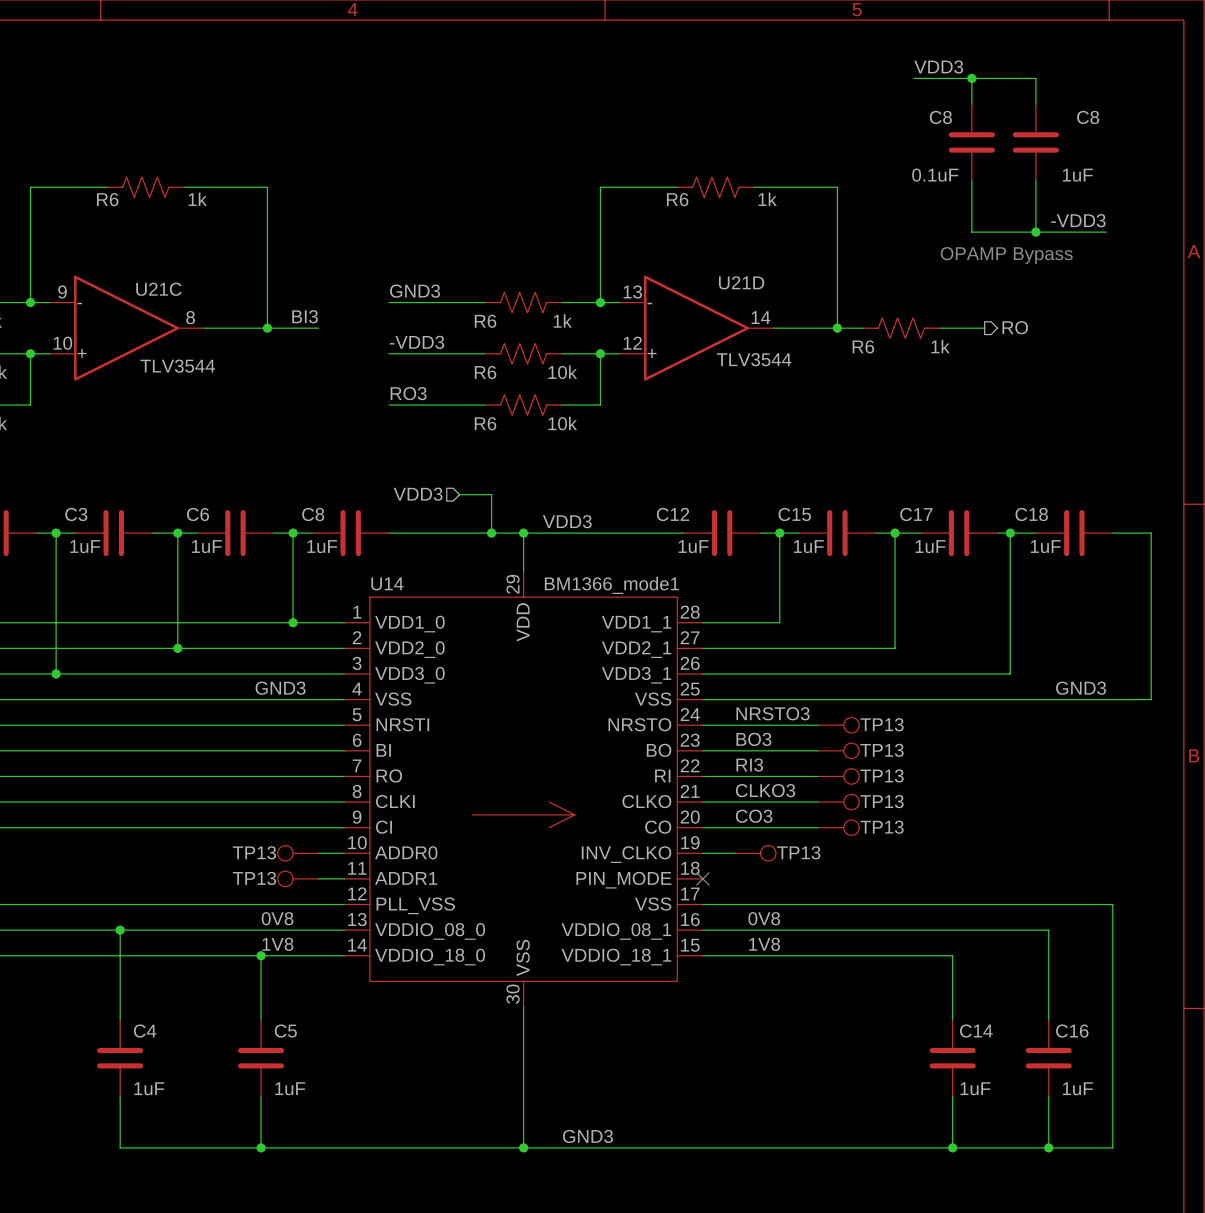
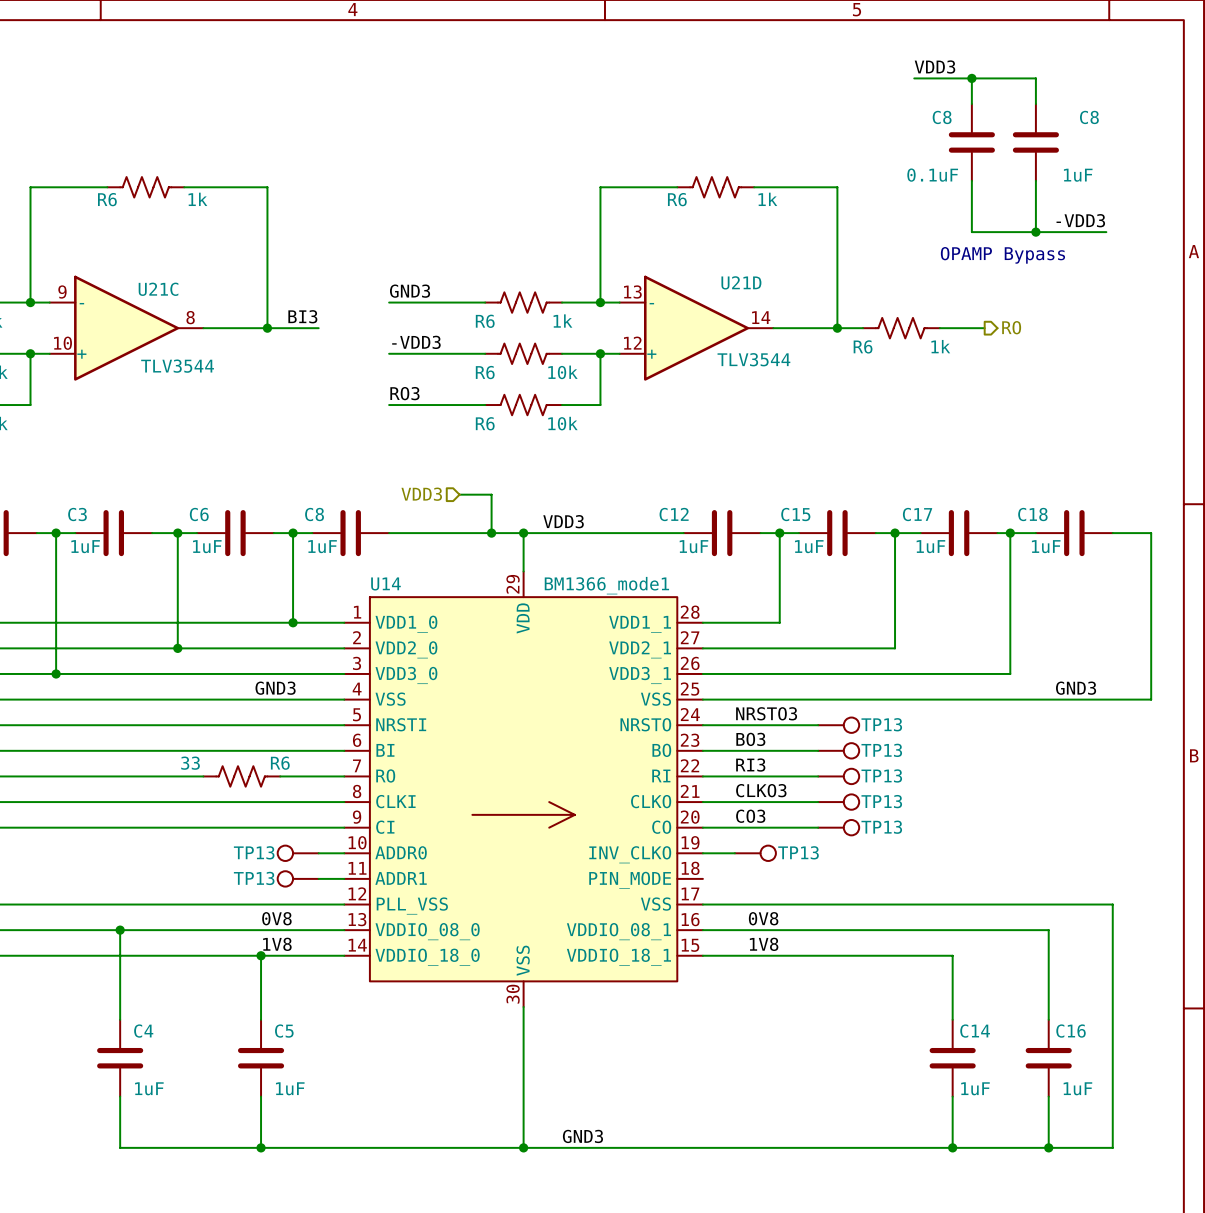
R6: none -> 33 (241, 776)
no-connect mark: (702, 878) -> none

